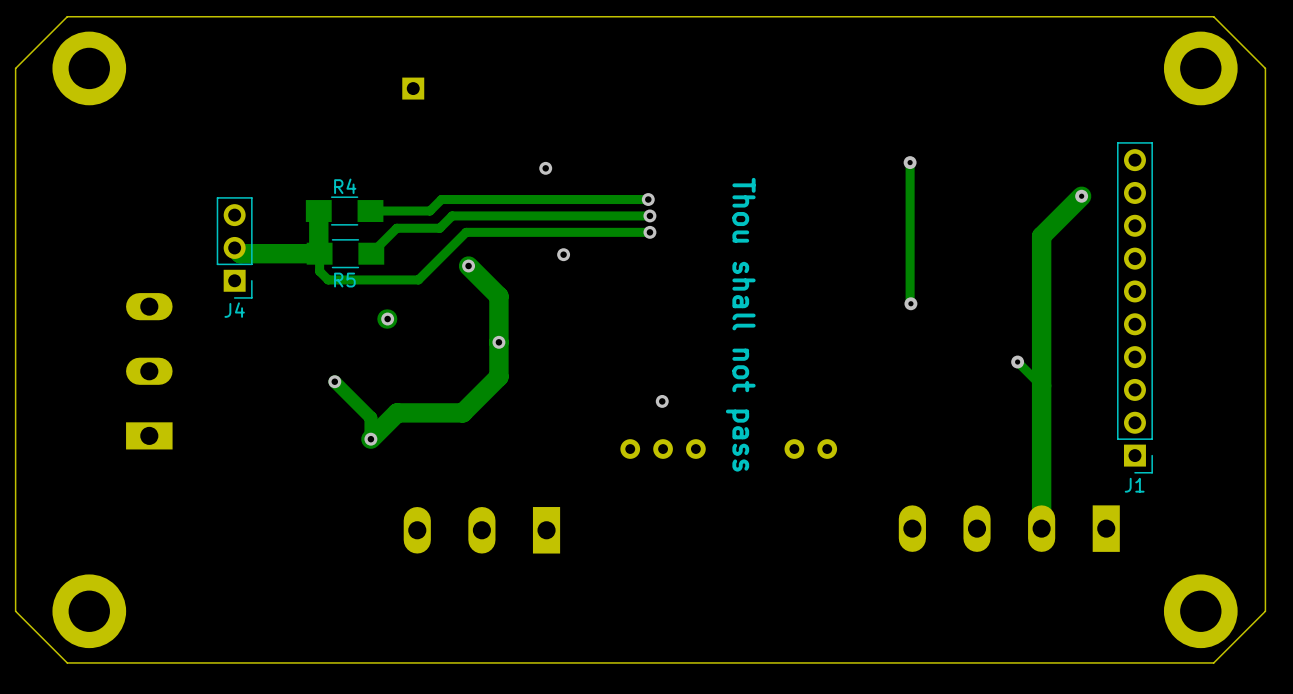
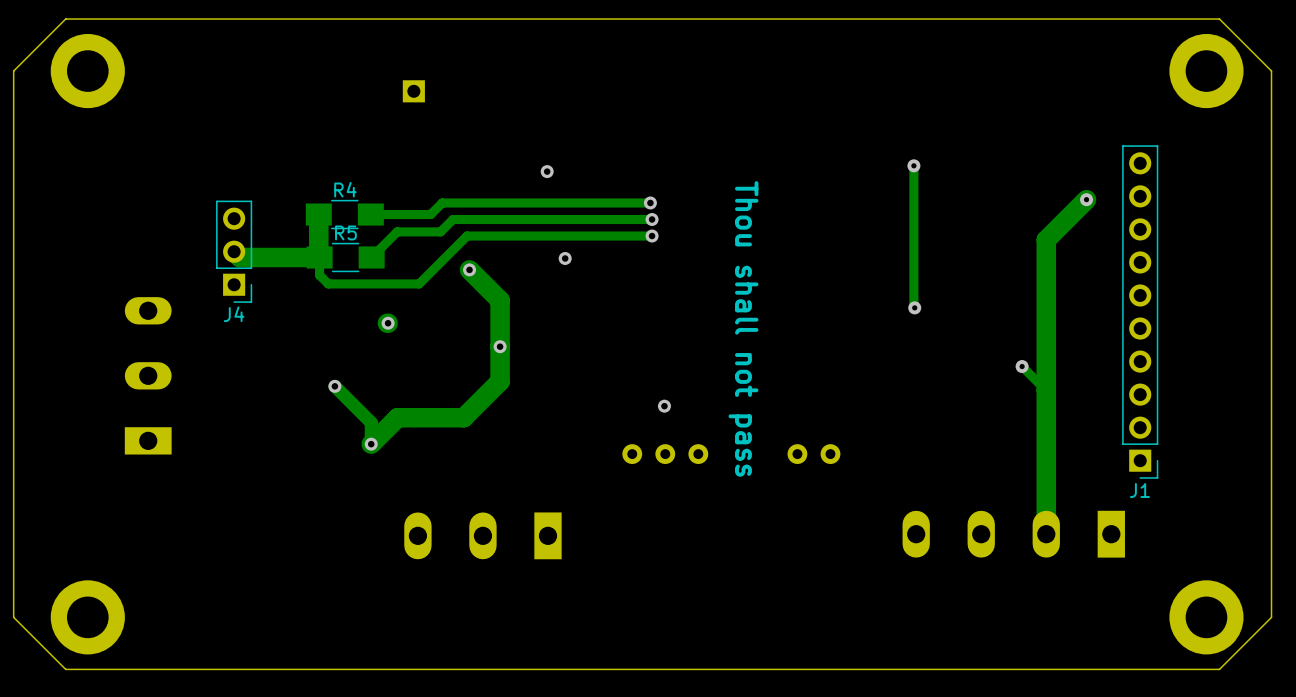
R5 name position: R5 (344, 280) -> R5 (345, 232)

